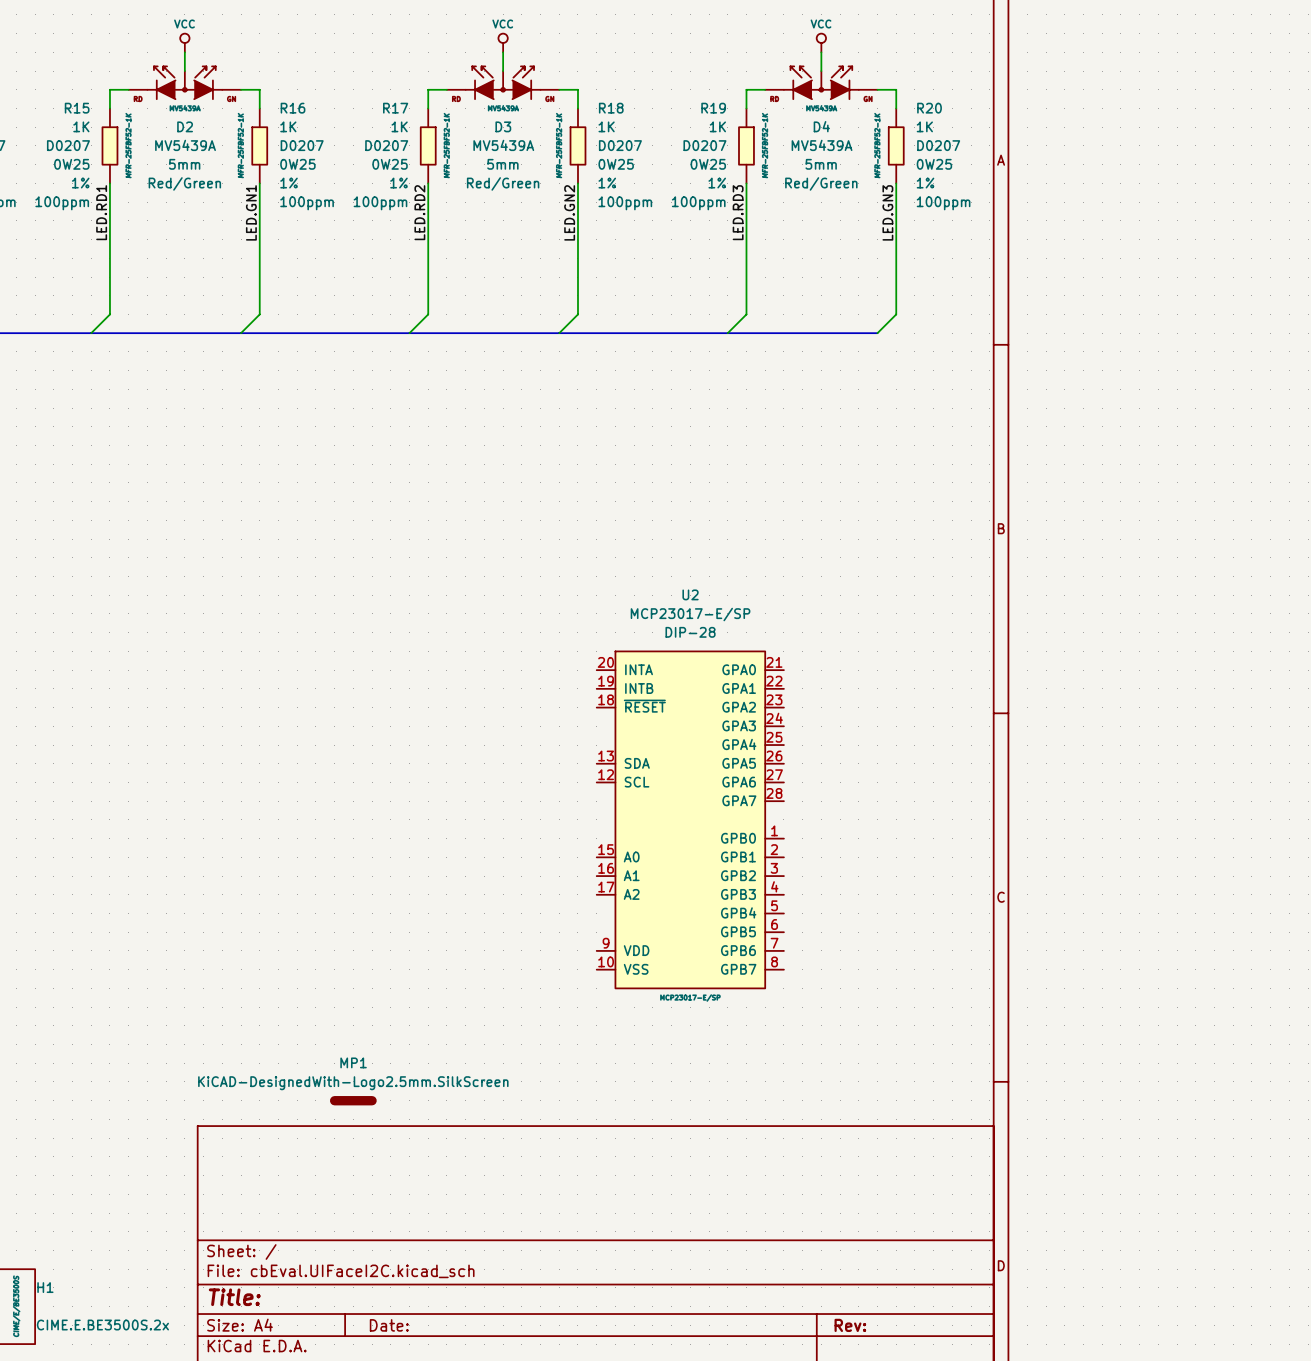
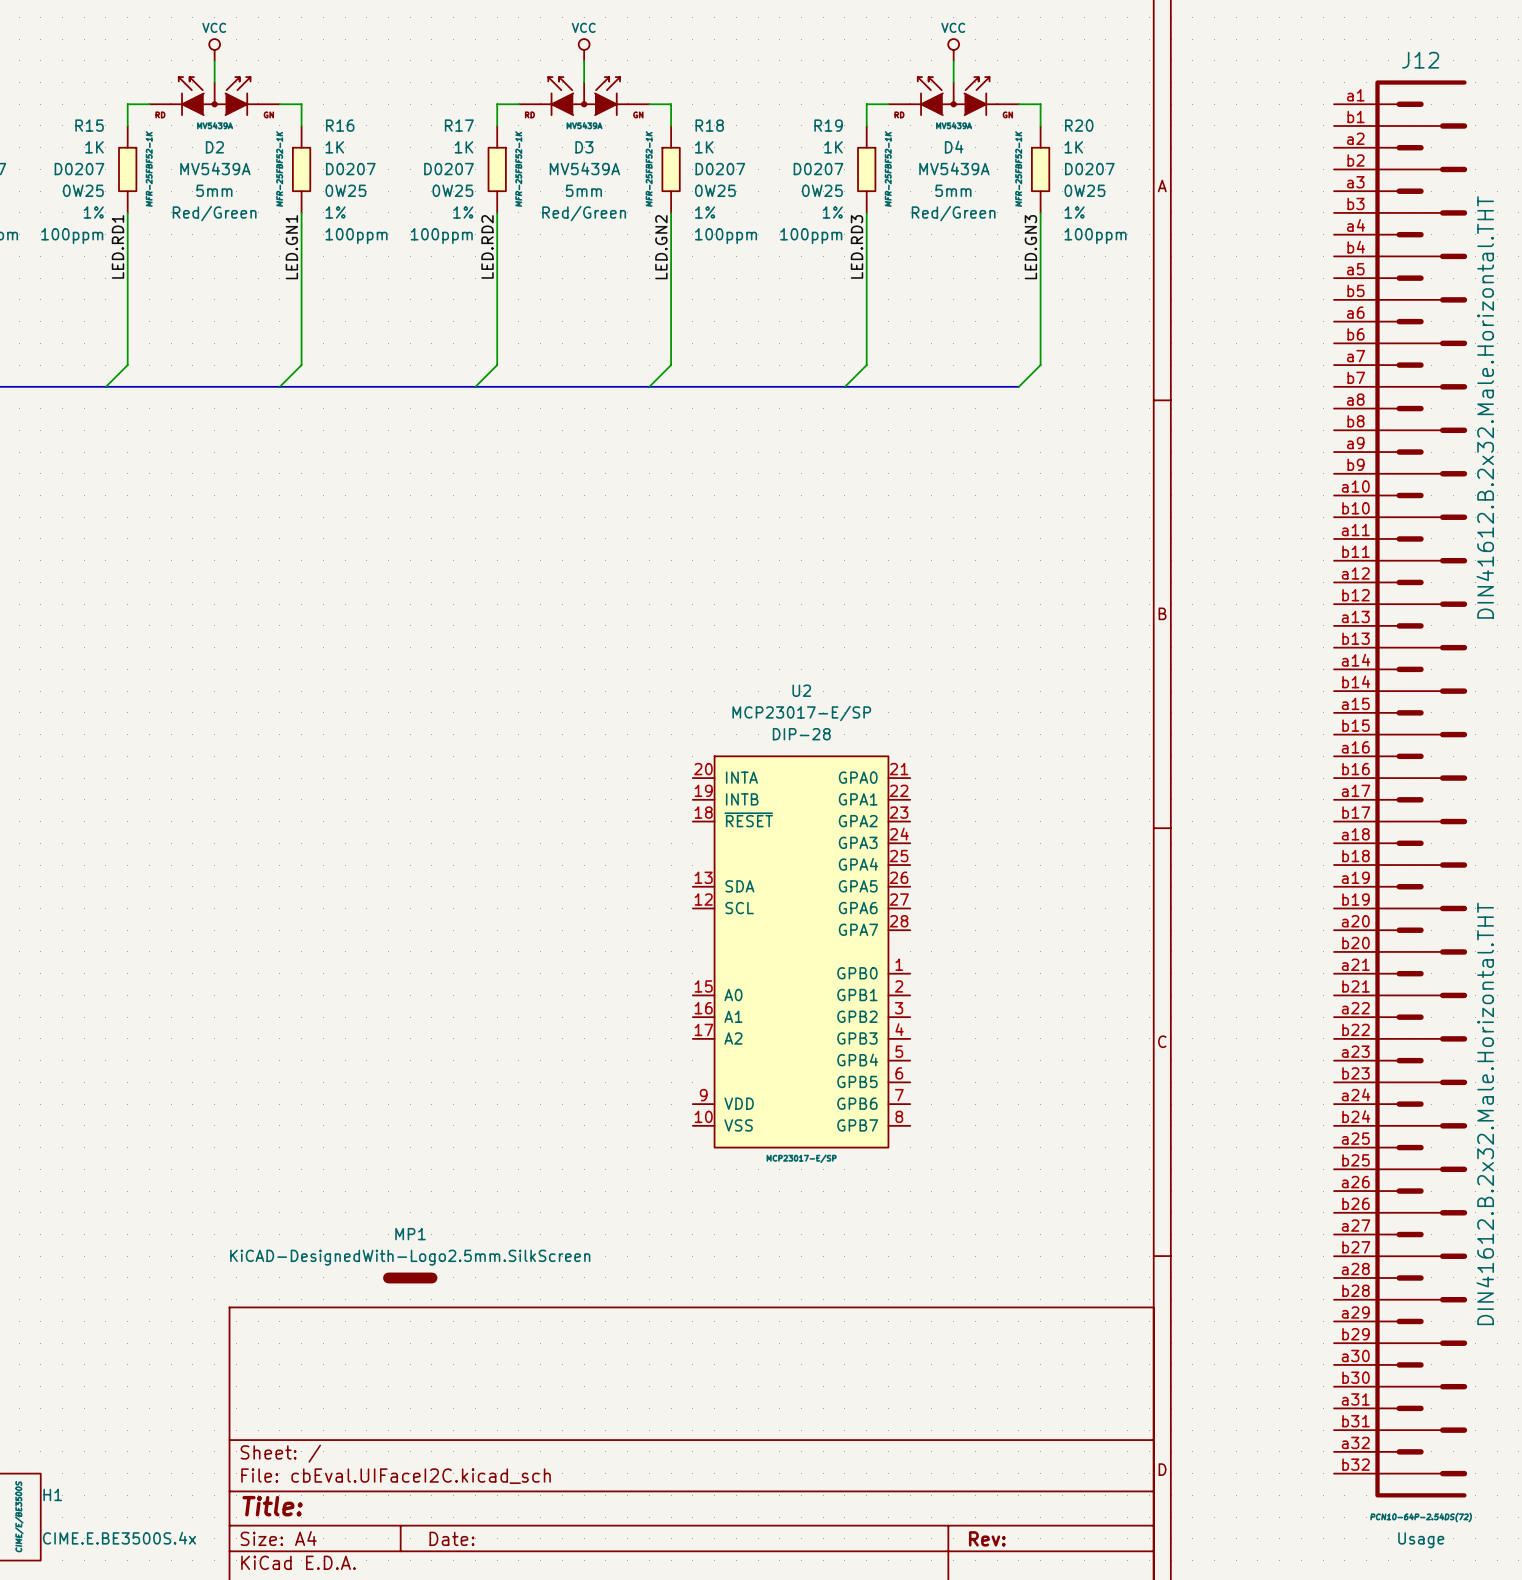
J12: none -> DIN41612.B.2x32.Male.Horizontal.THT (1400, 788)
H1 value: CIME.E.BE3500S.2x (102, 1325) -> CIME.E.BE3500S.4x (119, 1538)

